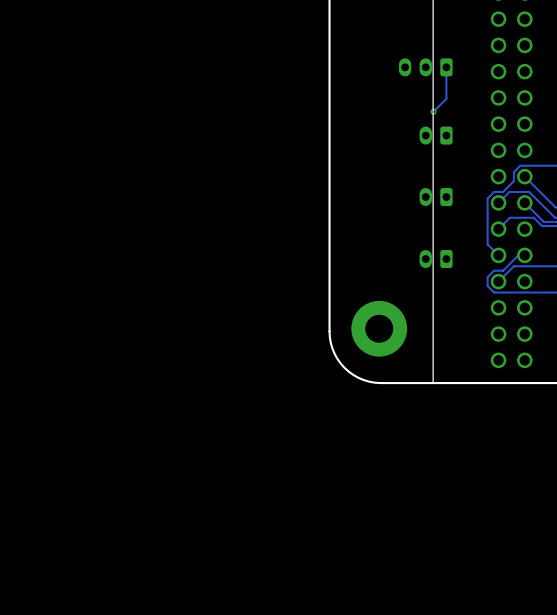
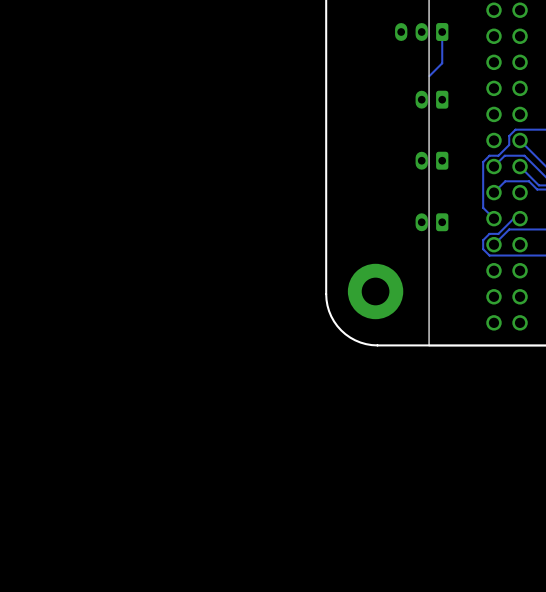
via: (433, 111) -> none

